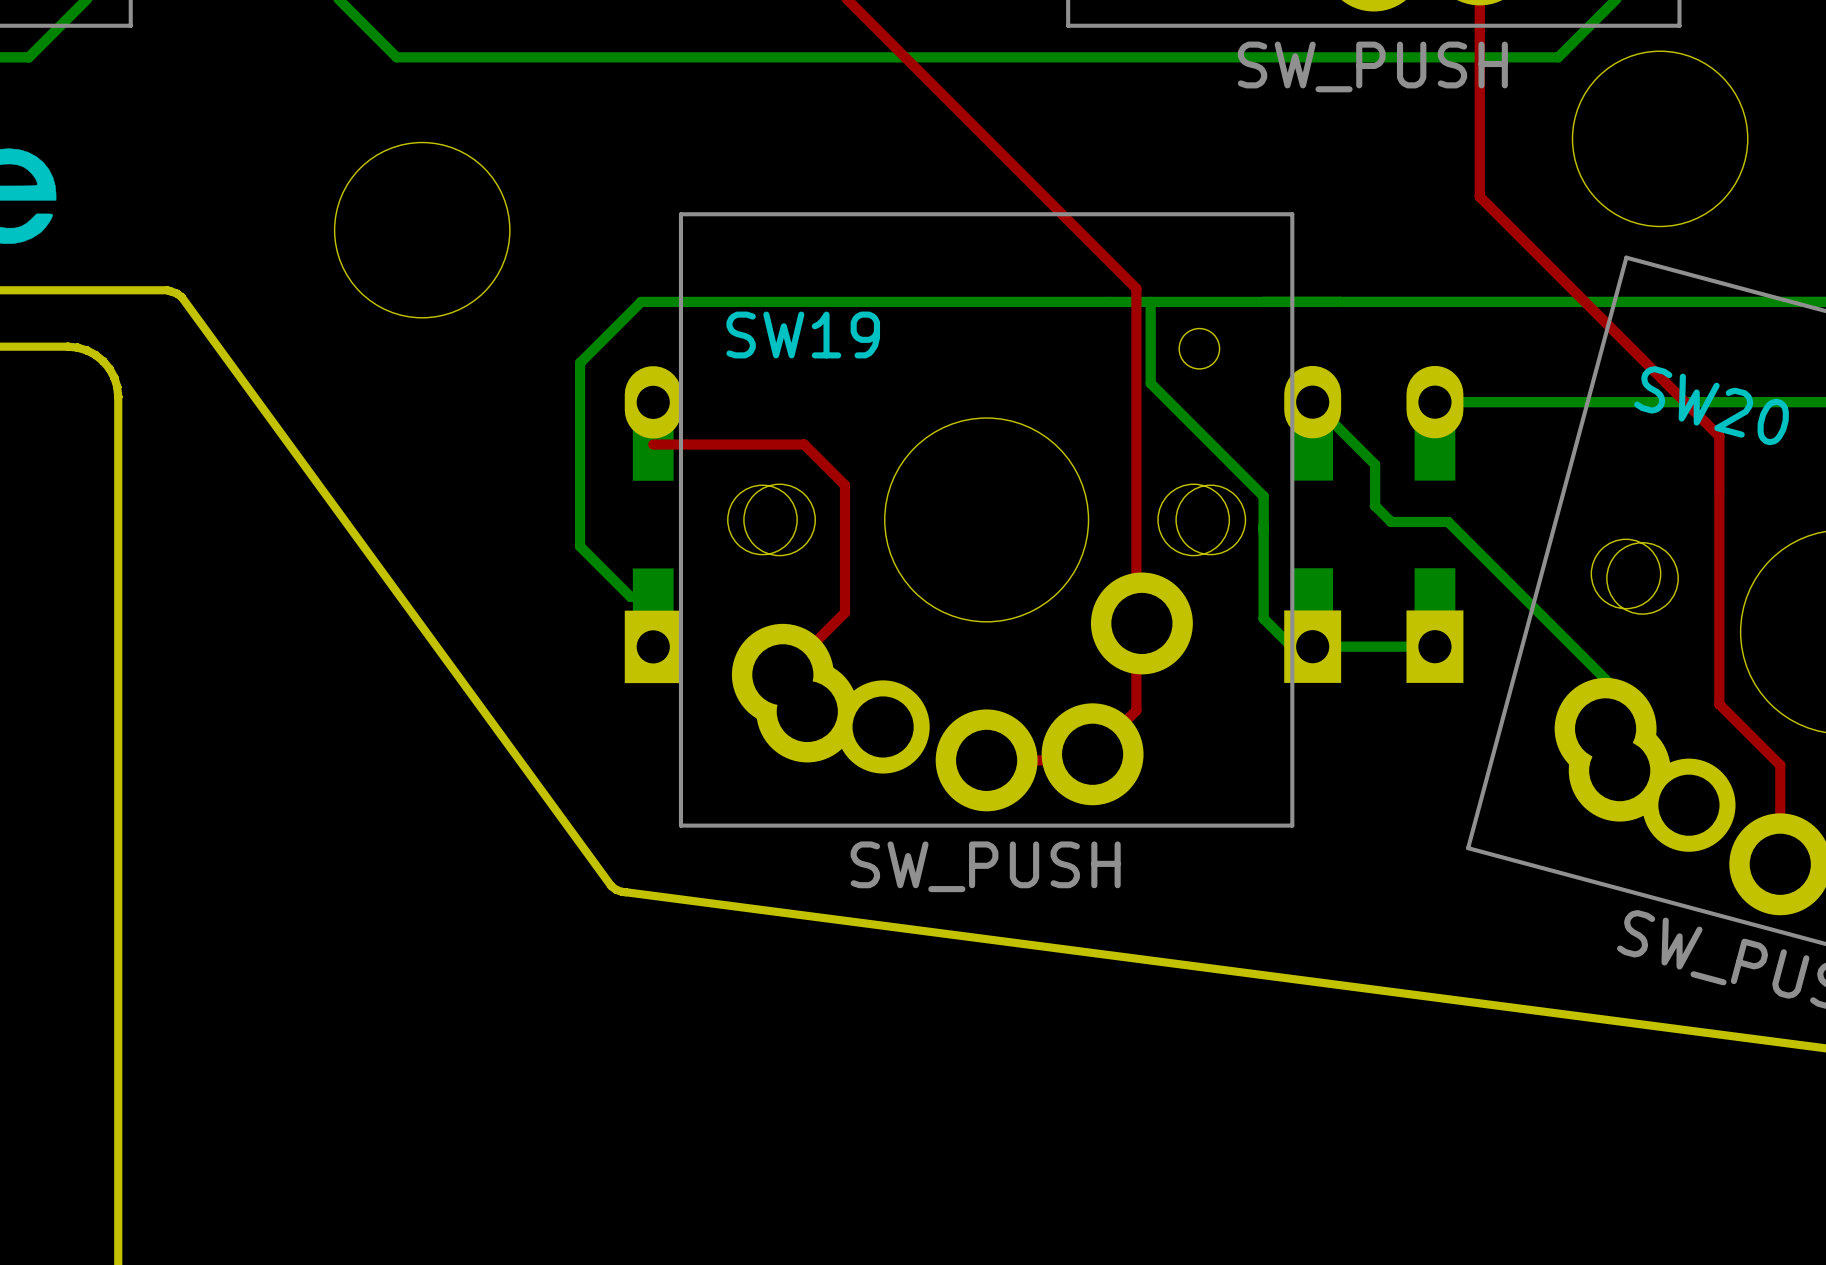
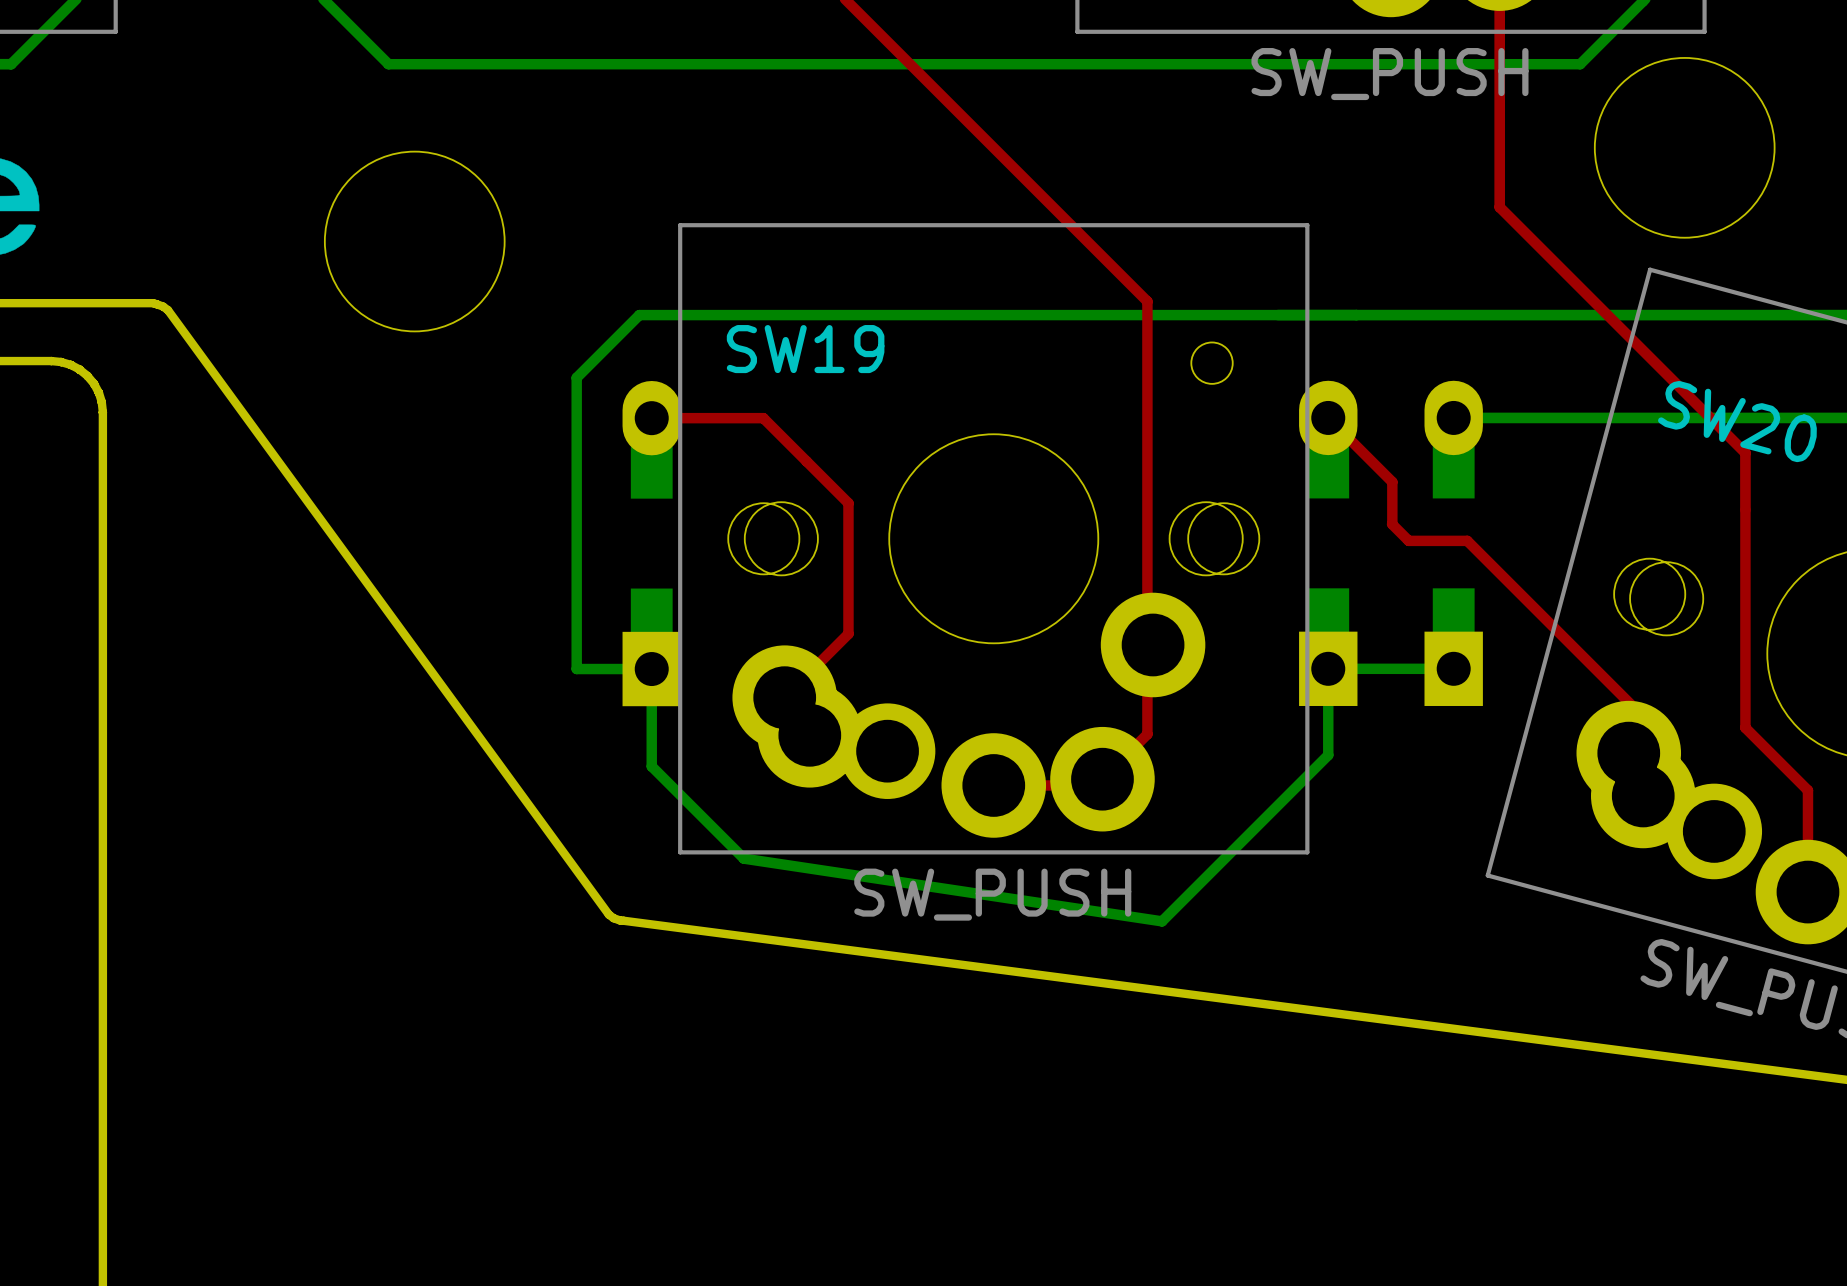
bottom track: (1150, 301) (1150, 383) (1263, 496) (1263, 618) (1291, 646) (1312, 646) -> (576, 565) (576, 669) (651, 669) (651, 766) (743, 858) (1162, 921) (1328, 755) (1328, 668)
bottom track: (1312, 402) (1375, 464) (1375, 505) -> none
top track: none -> (1328, 417) (1392, 482) (1392, 523)
top track: (653, 444) (804, 444) -> (651, 418) (763, 418) (806, 461)
bottom track: (1374, 505) (1391, 521) (1448, 521) (1619, 693) -> none
top track: none -> (1392, 524) (1408, 540) (1467, 540) (1643, 716)
bottom track: (580, 546) (630, 596) (653, 596) -> none

